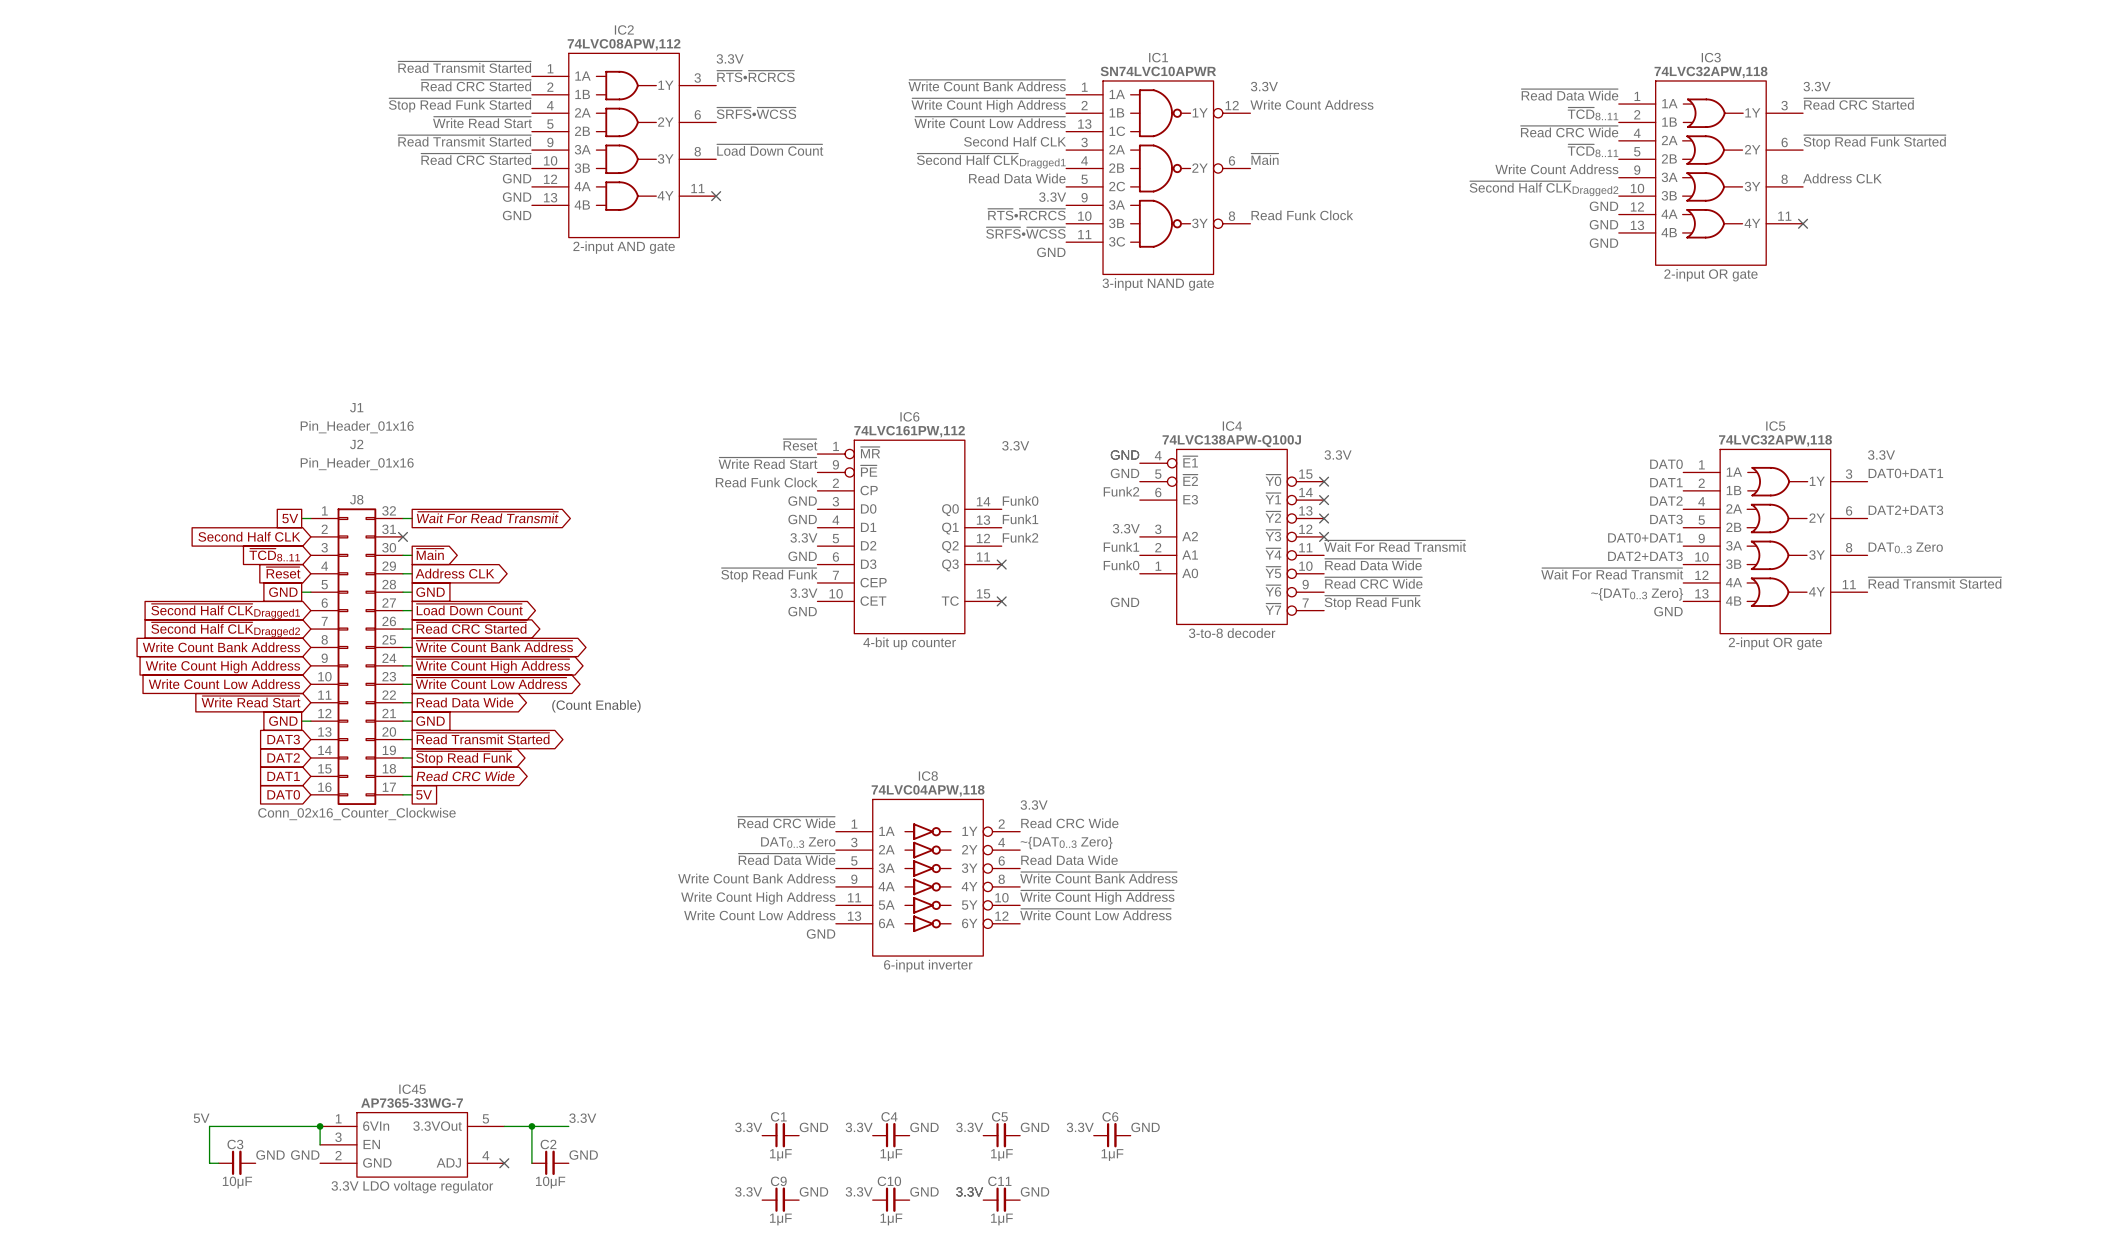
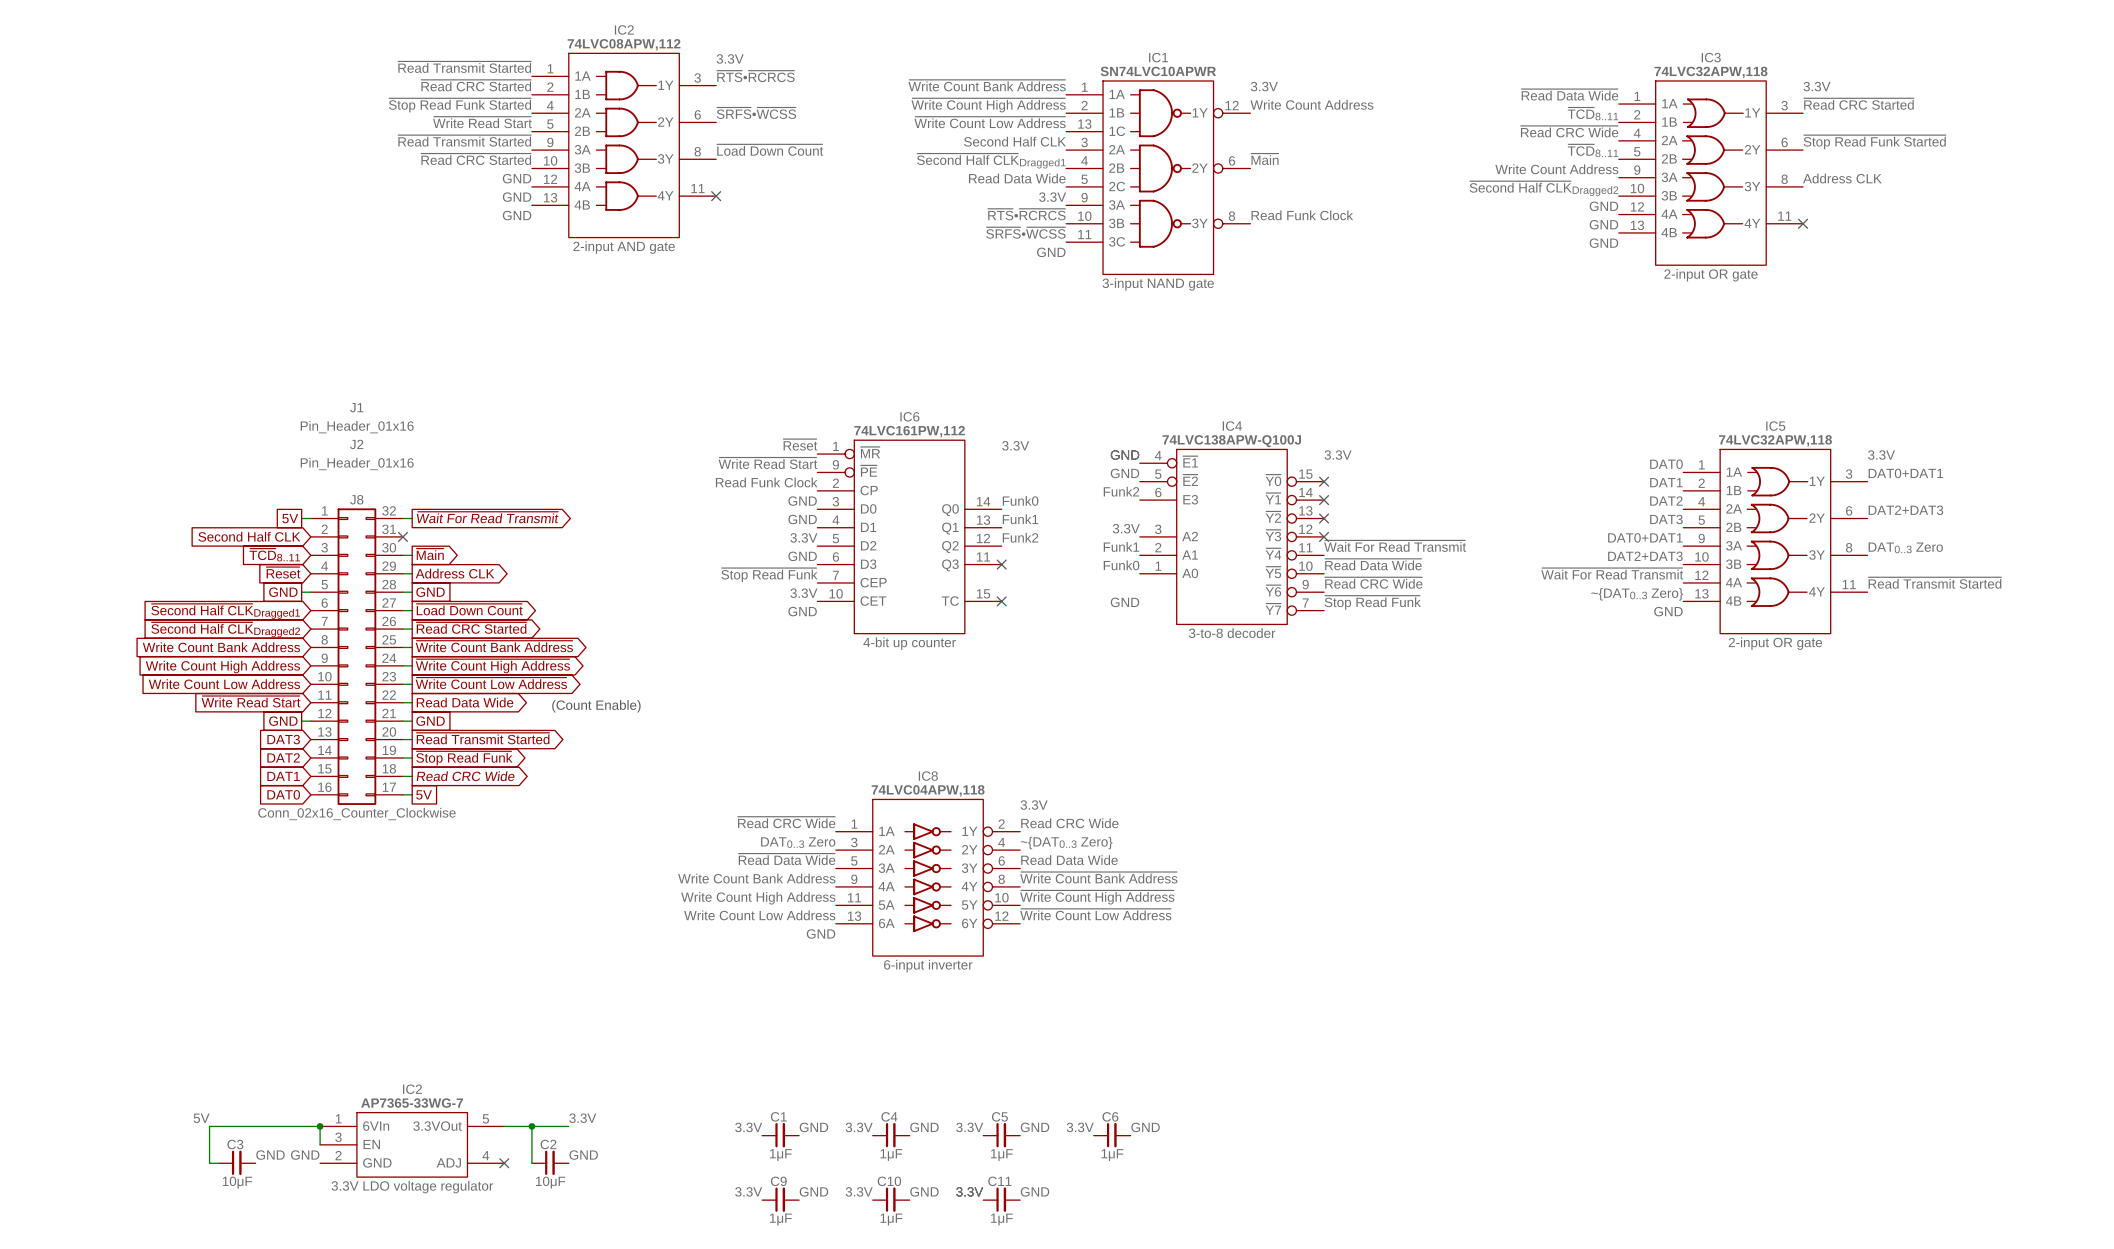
IC45 name: IC45 (412, 1089) -> IC2 (412, 1089)

